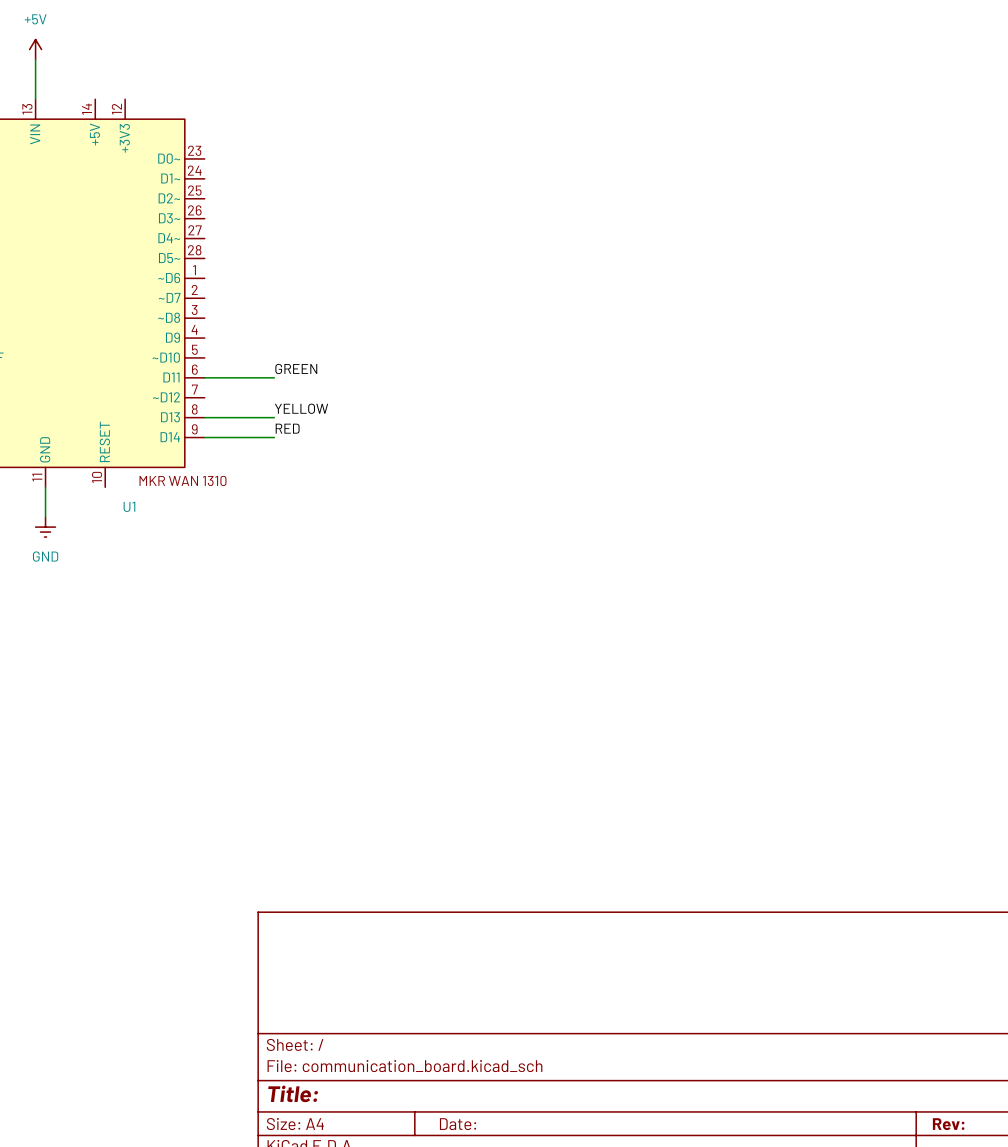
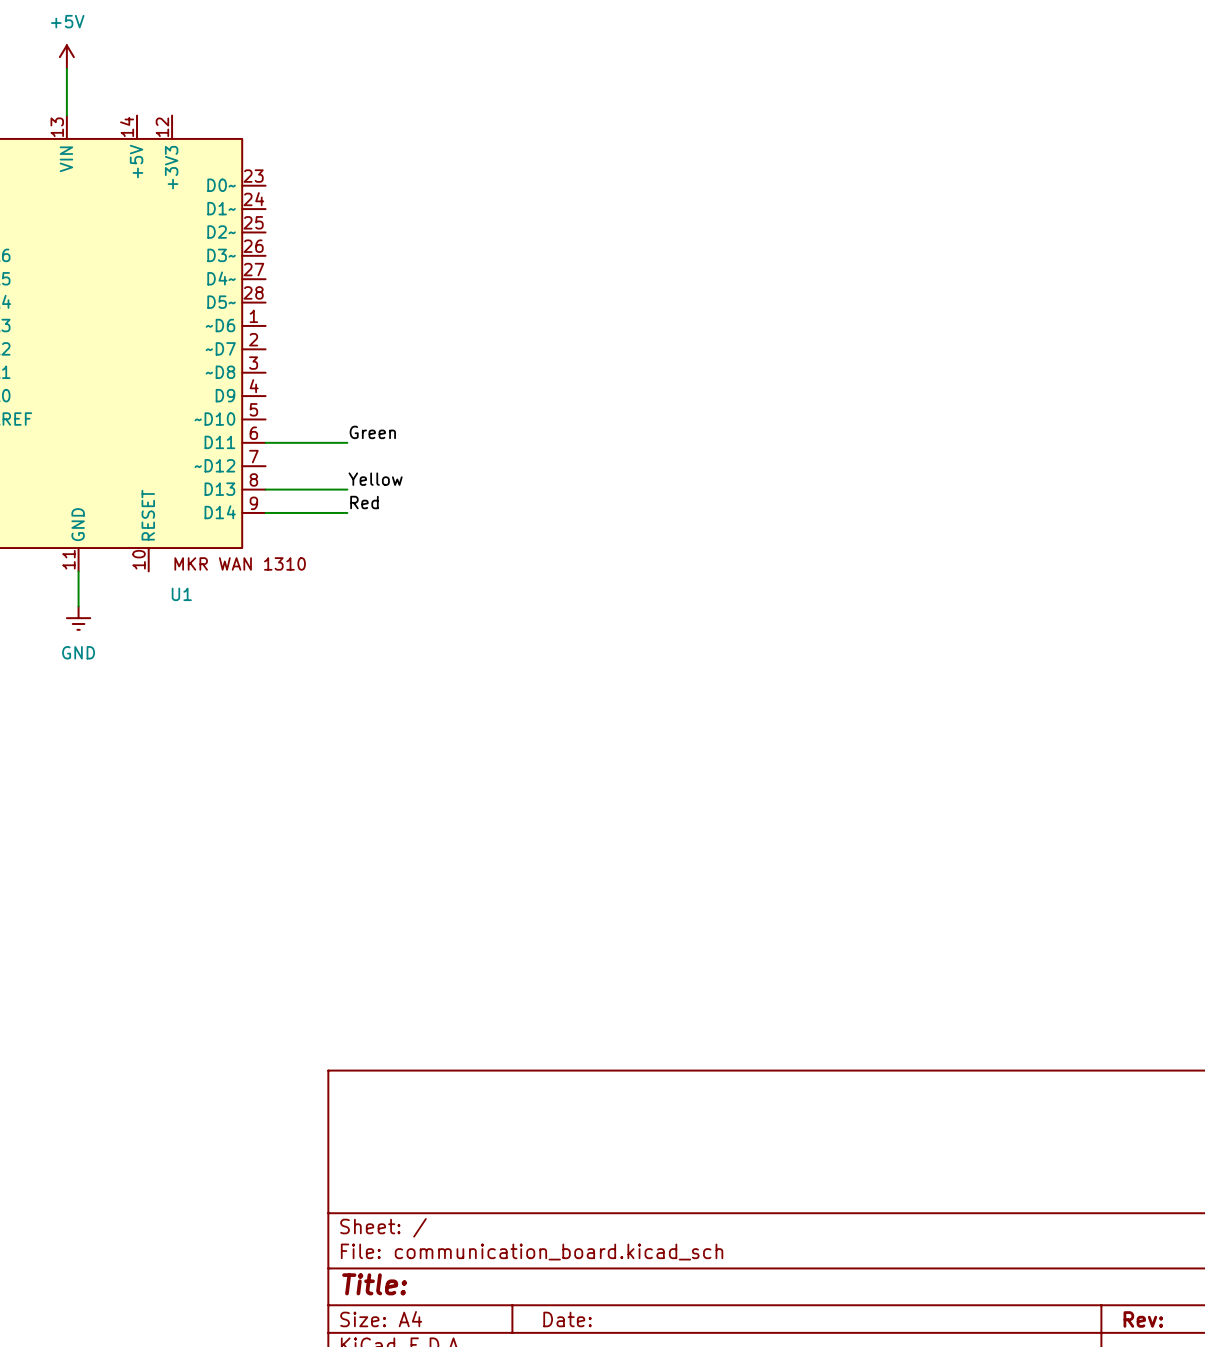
label: GREEN (296, 368) -> Green (372, 432)
label: YELLOW (301, 408) -> Yellow (375, 479)
label: RED (287, 428) -> Red (364, 502)

